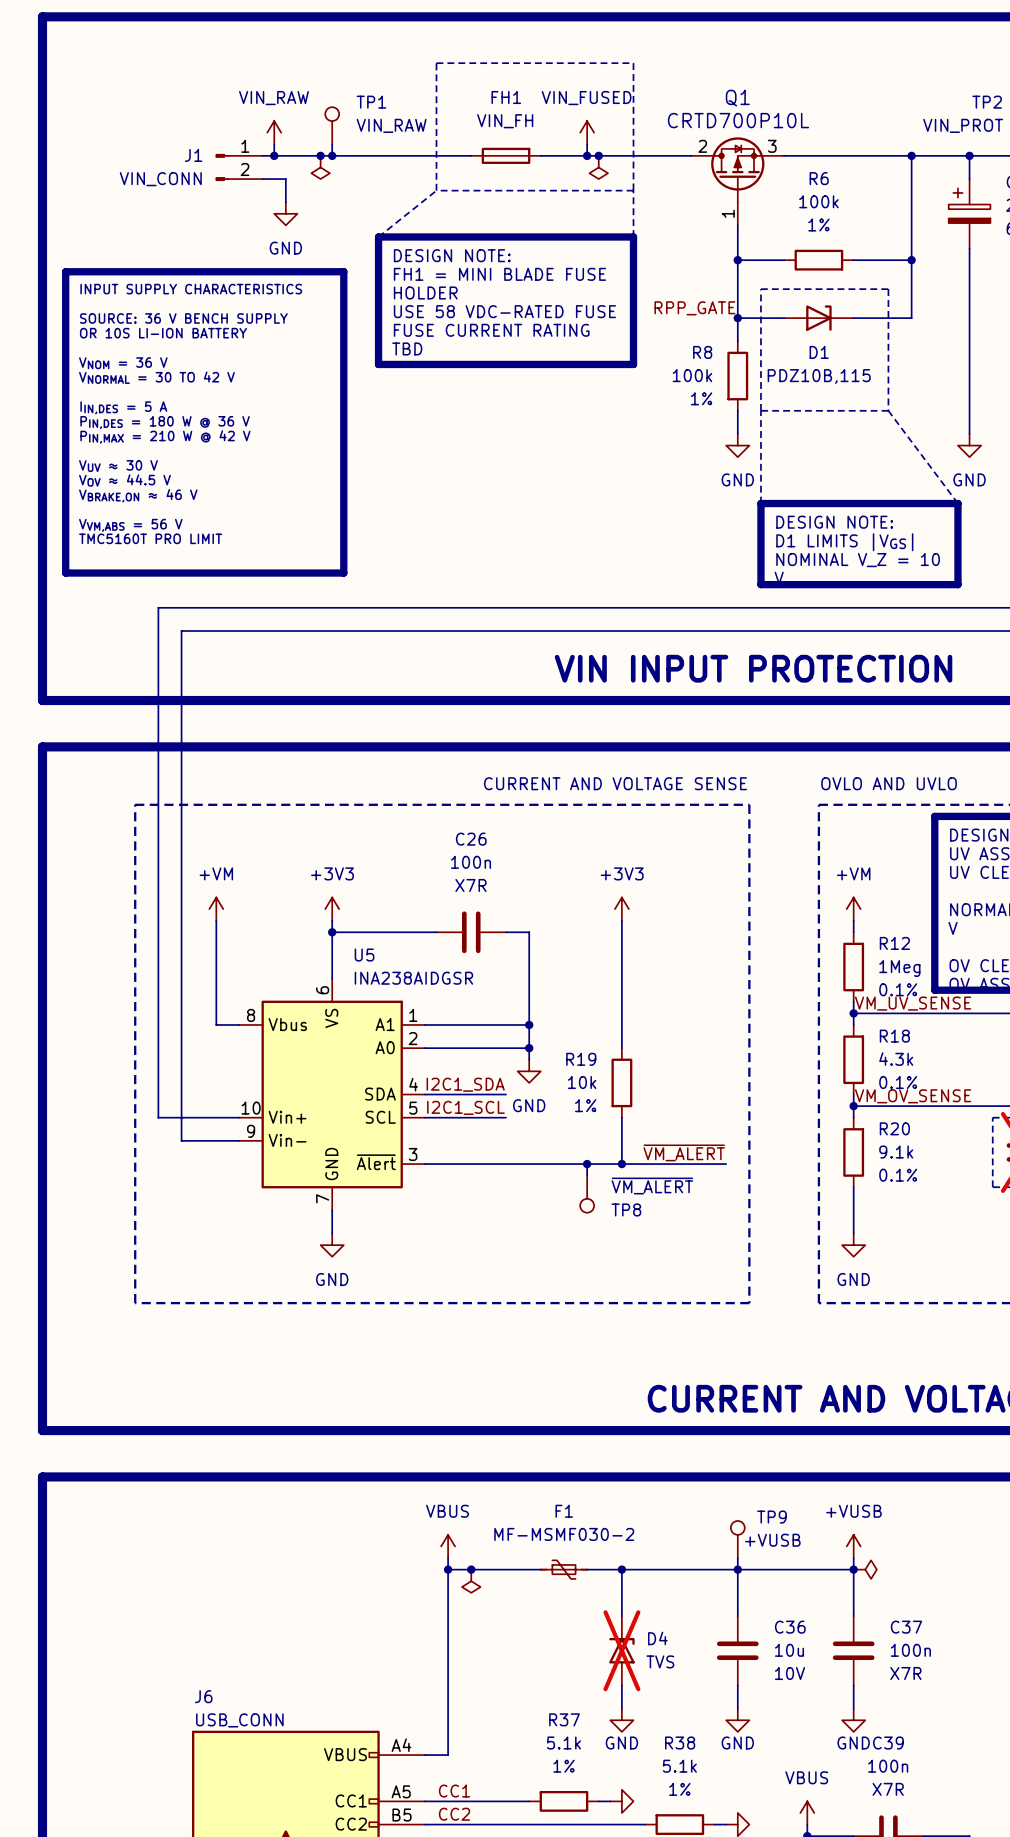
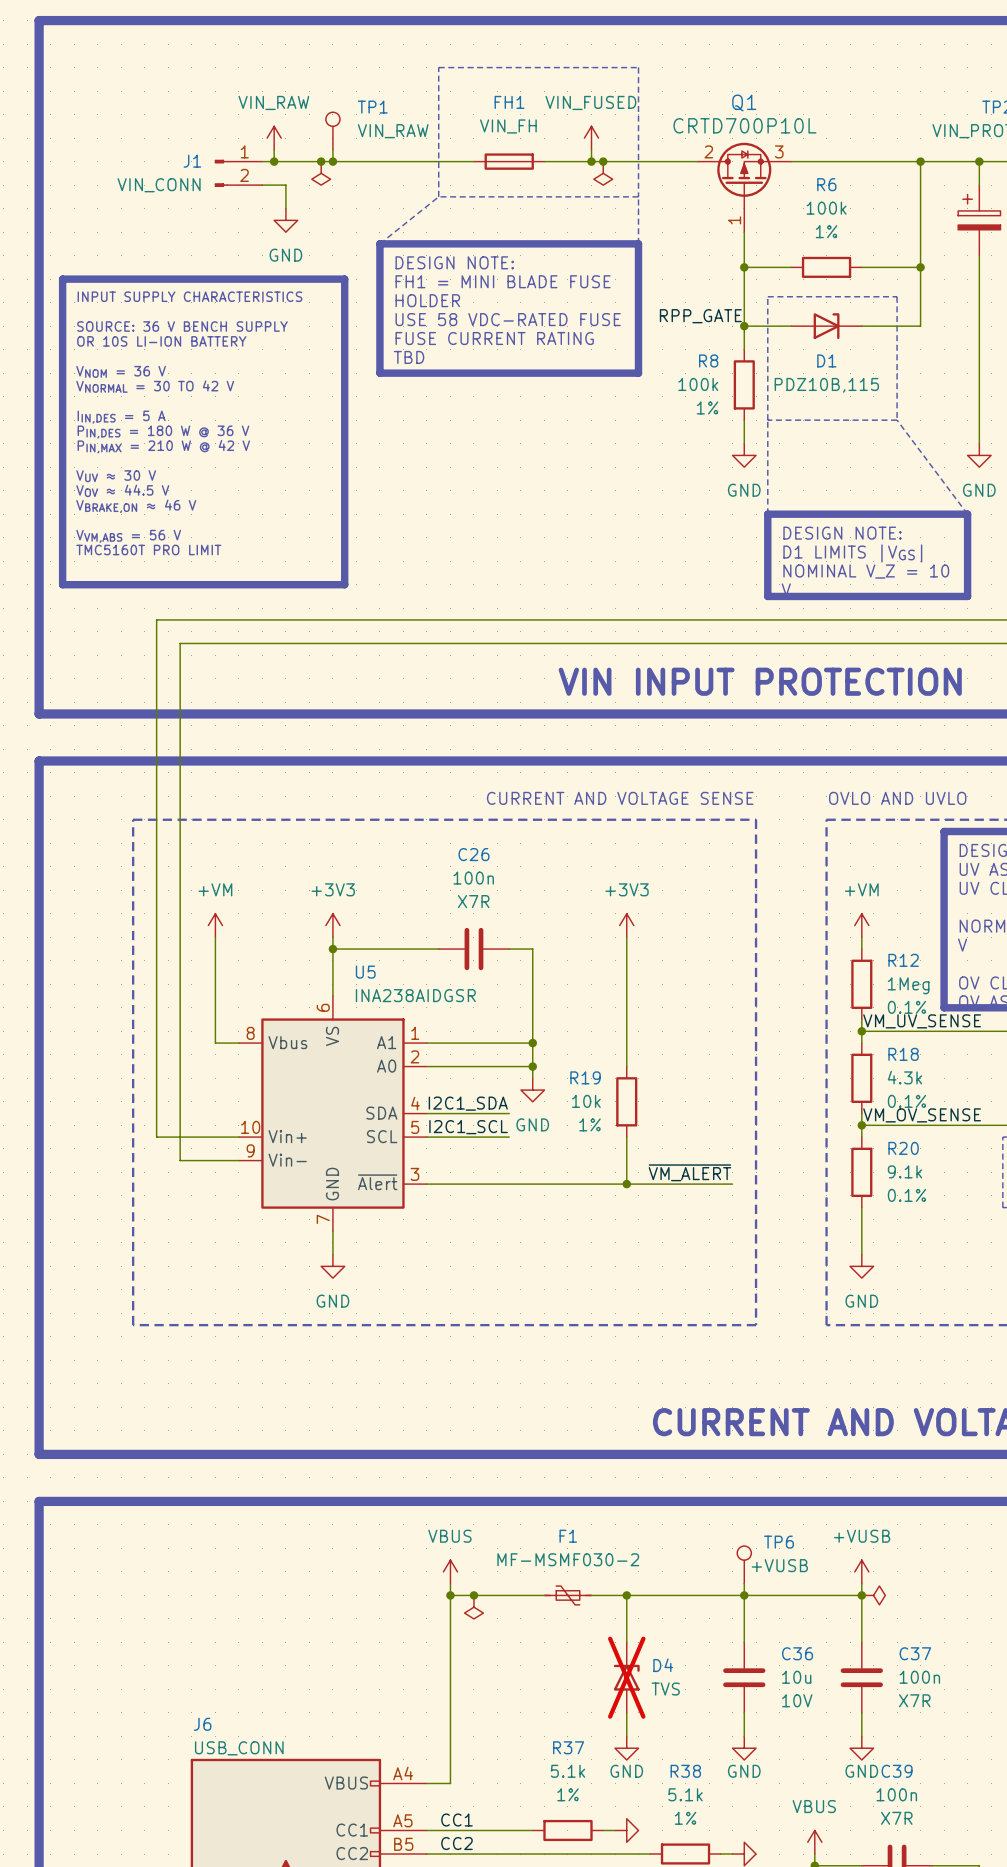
wire: (587, 1164) (587, 1175) -> none
junction: (587, 1164) -> none
TP8: ~{VM_ALERT} (587, 1194) -> none
TP9 name: TP9 (772, 1517) -> TP6 (778, 1542)

